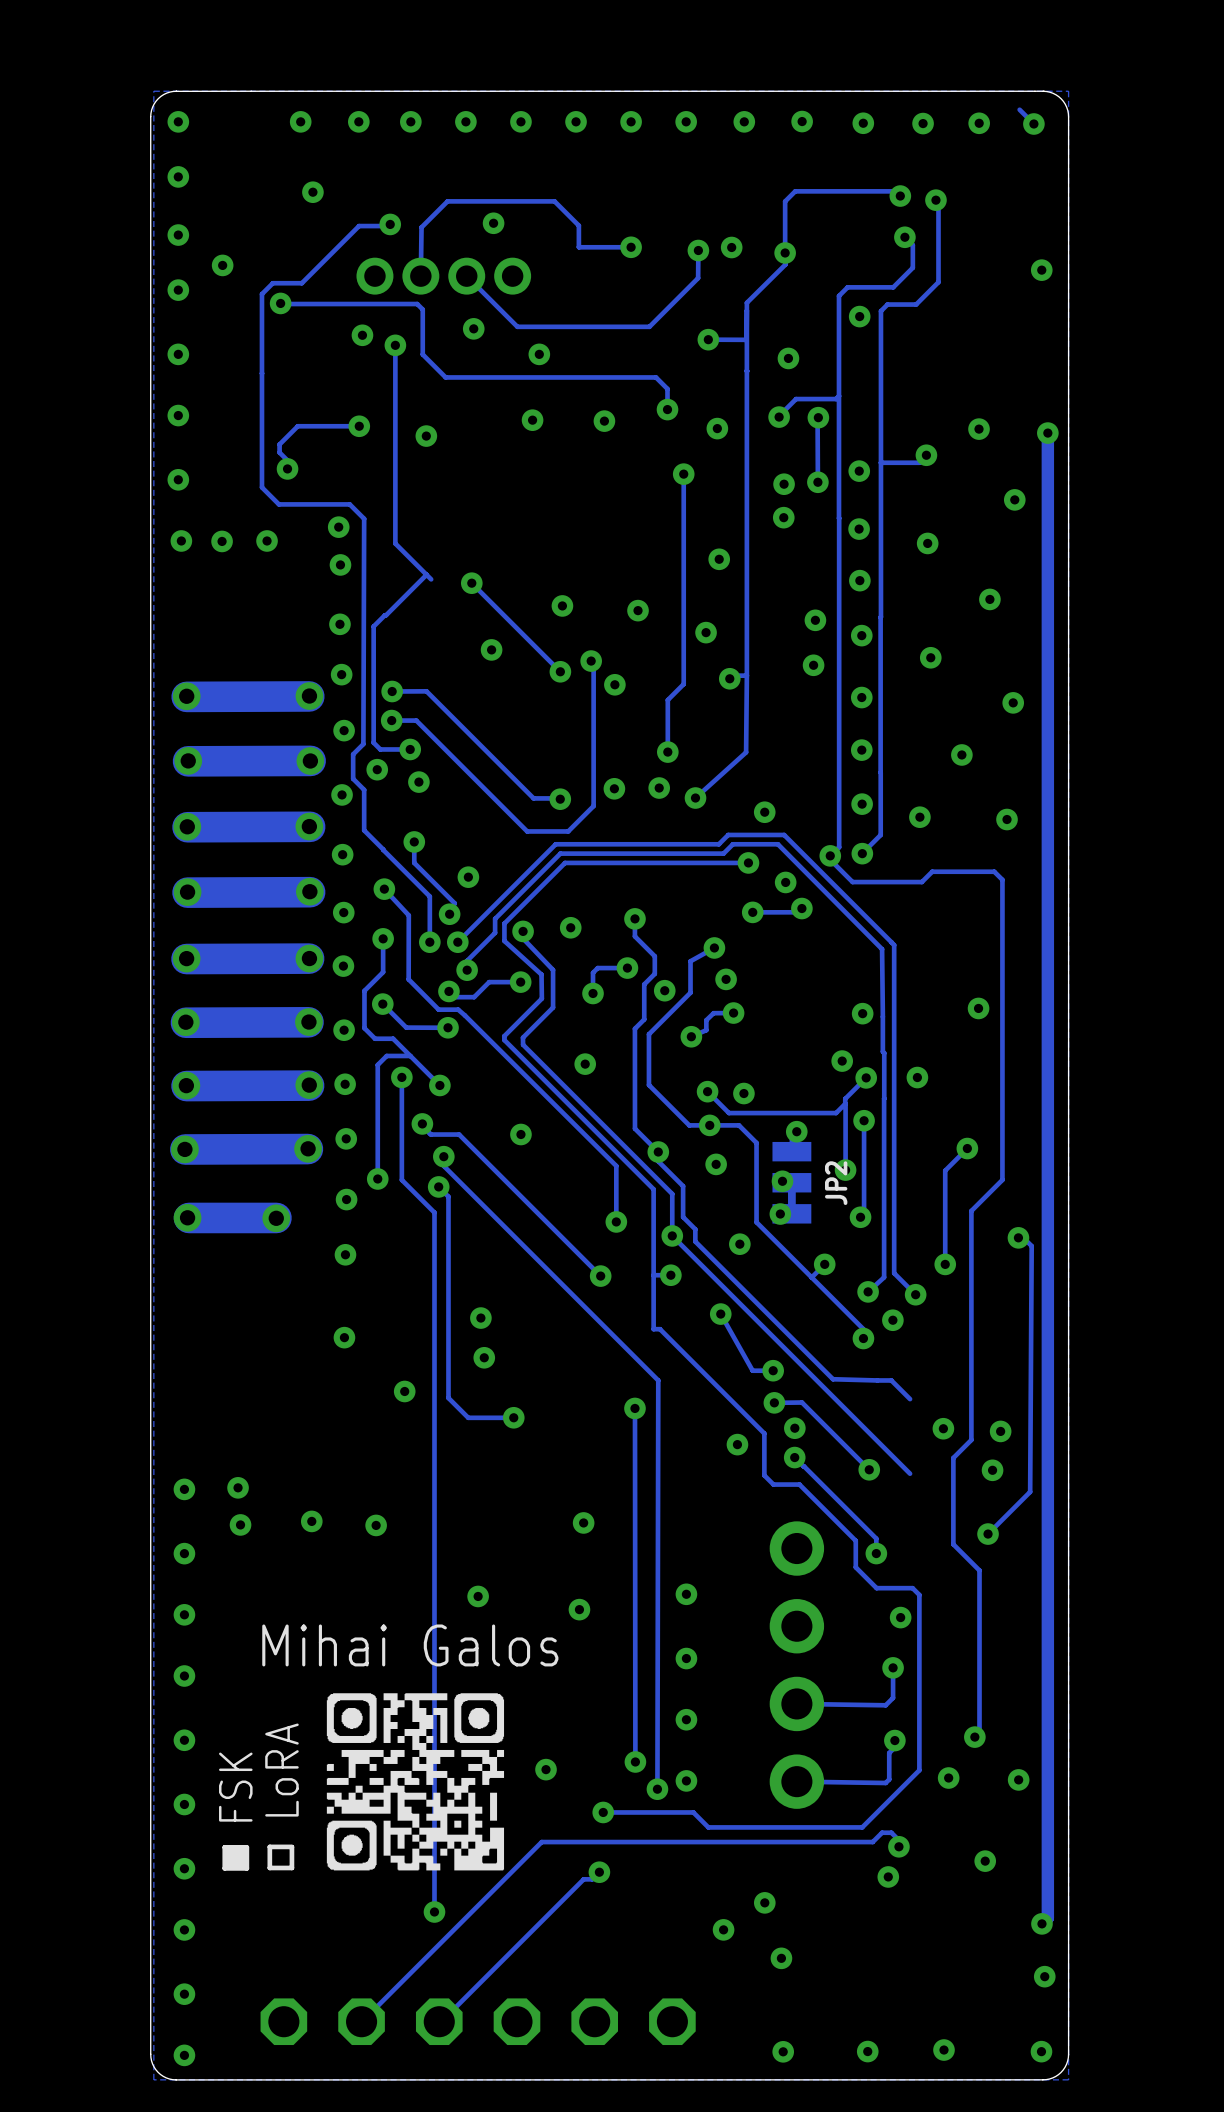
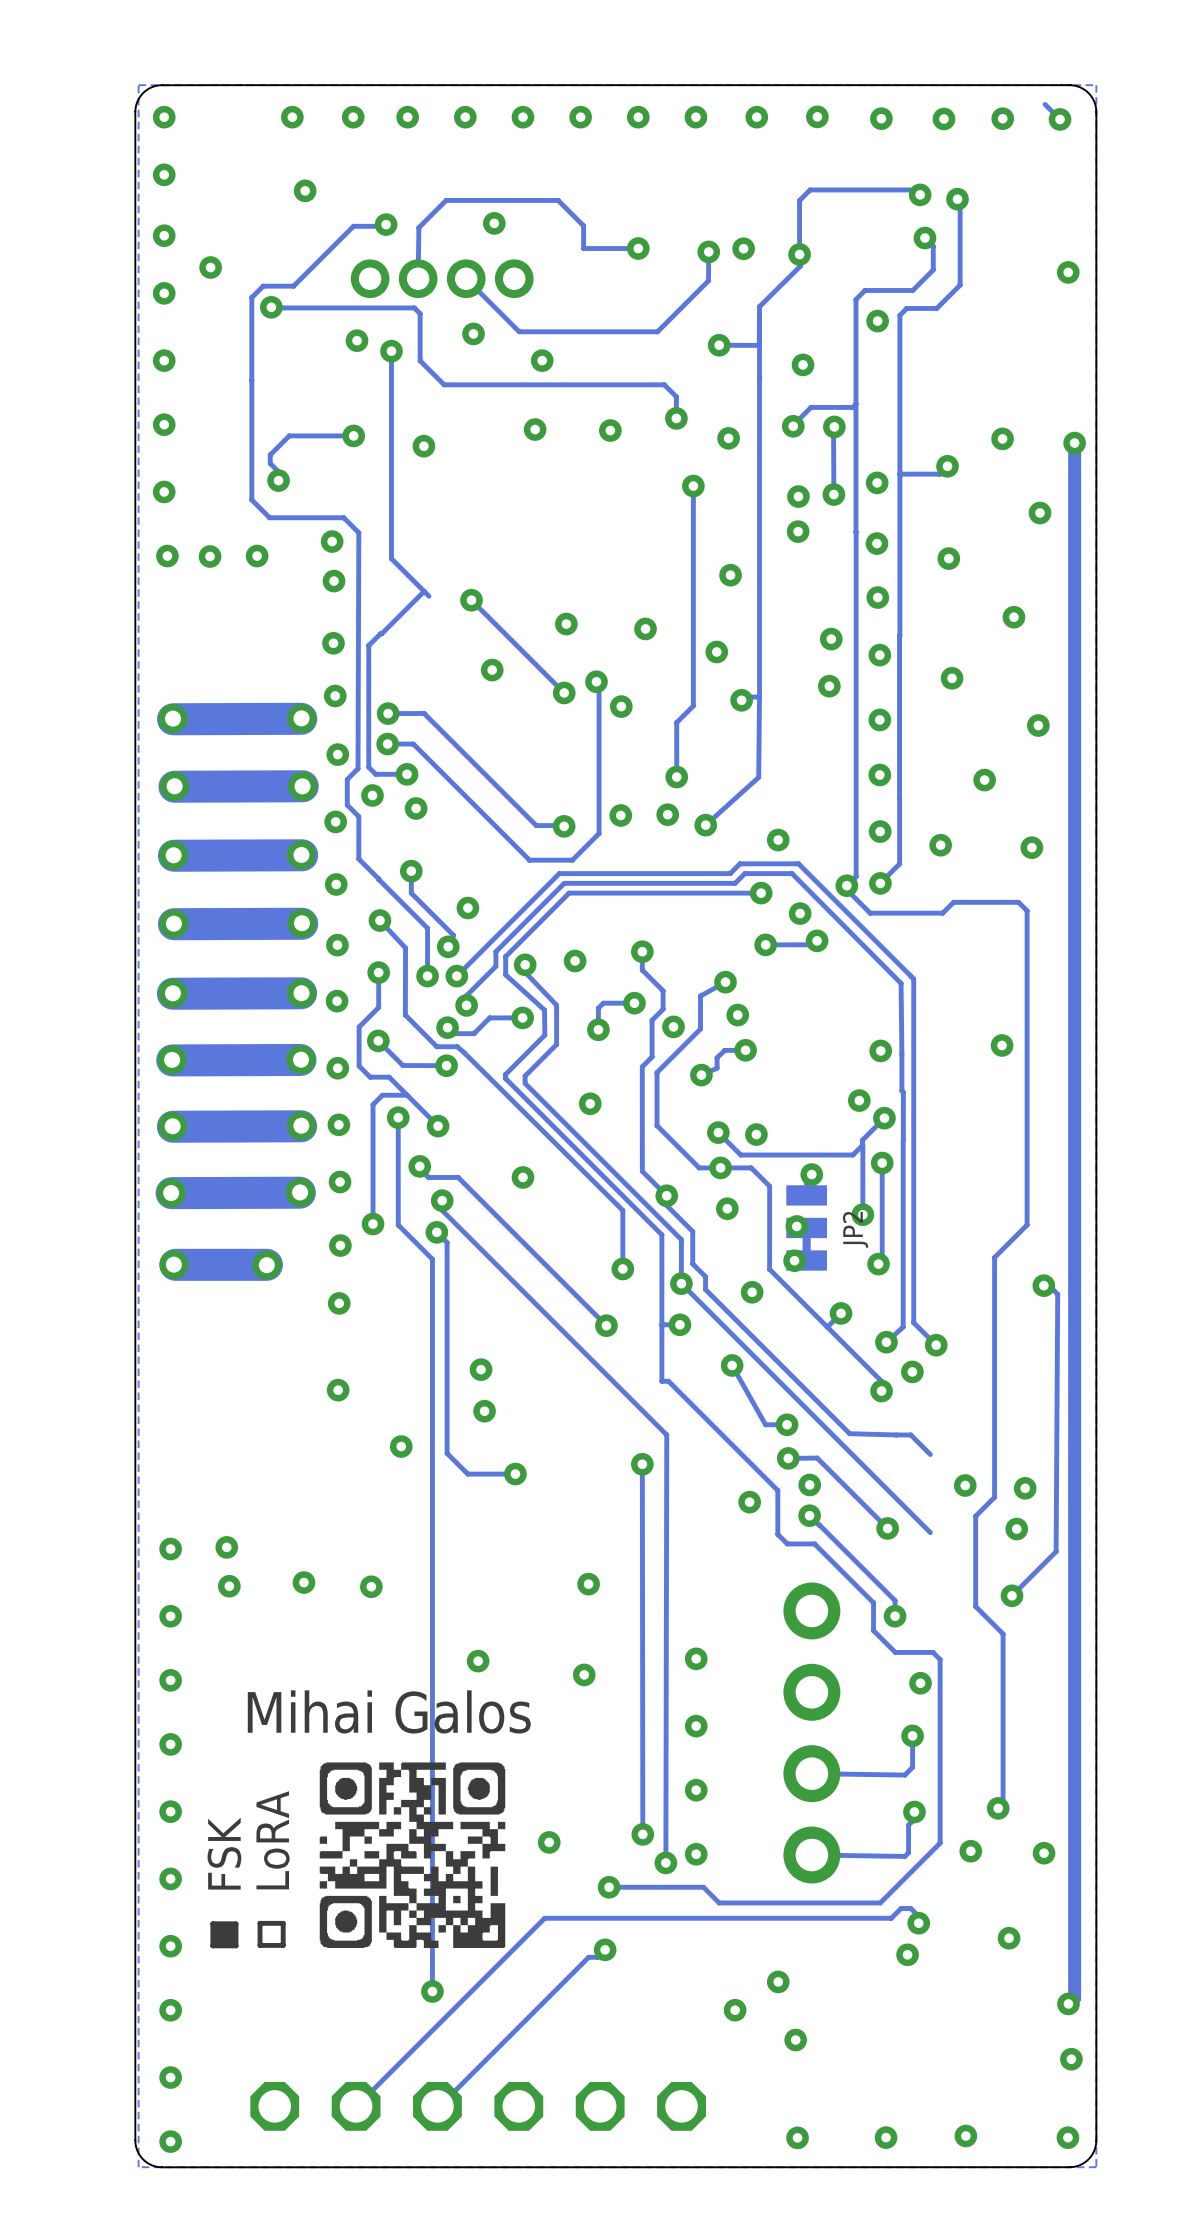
via: (917, 1077) -> none
track: (967, 1148) (945, 1170) (945, 1264) -> none
via: (967, 1148) -> none
via: (945, 1264) -> none

